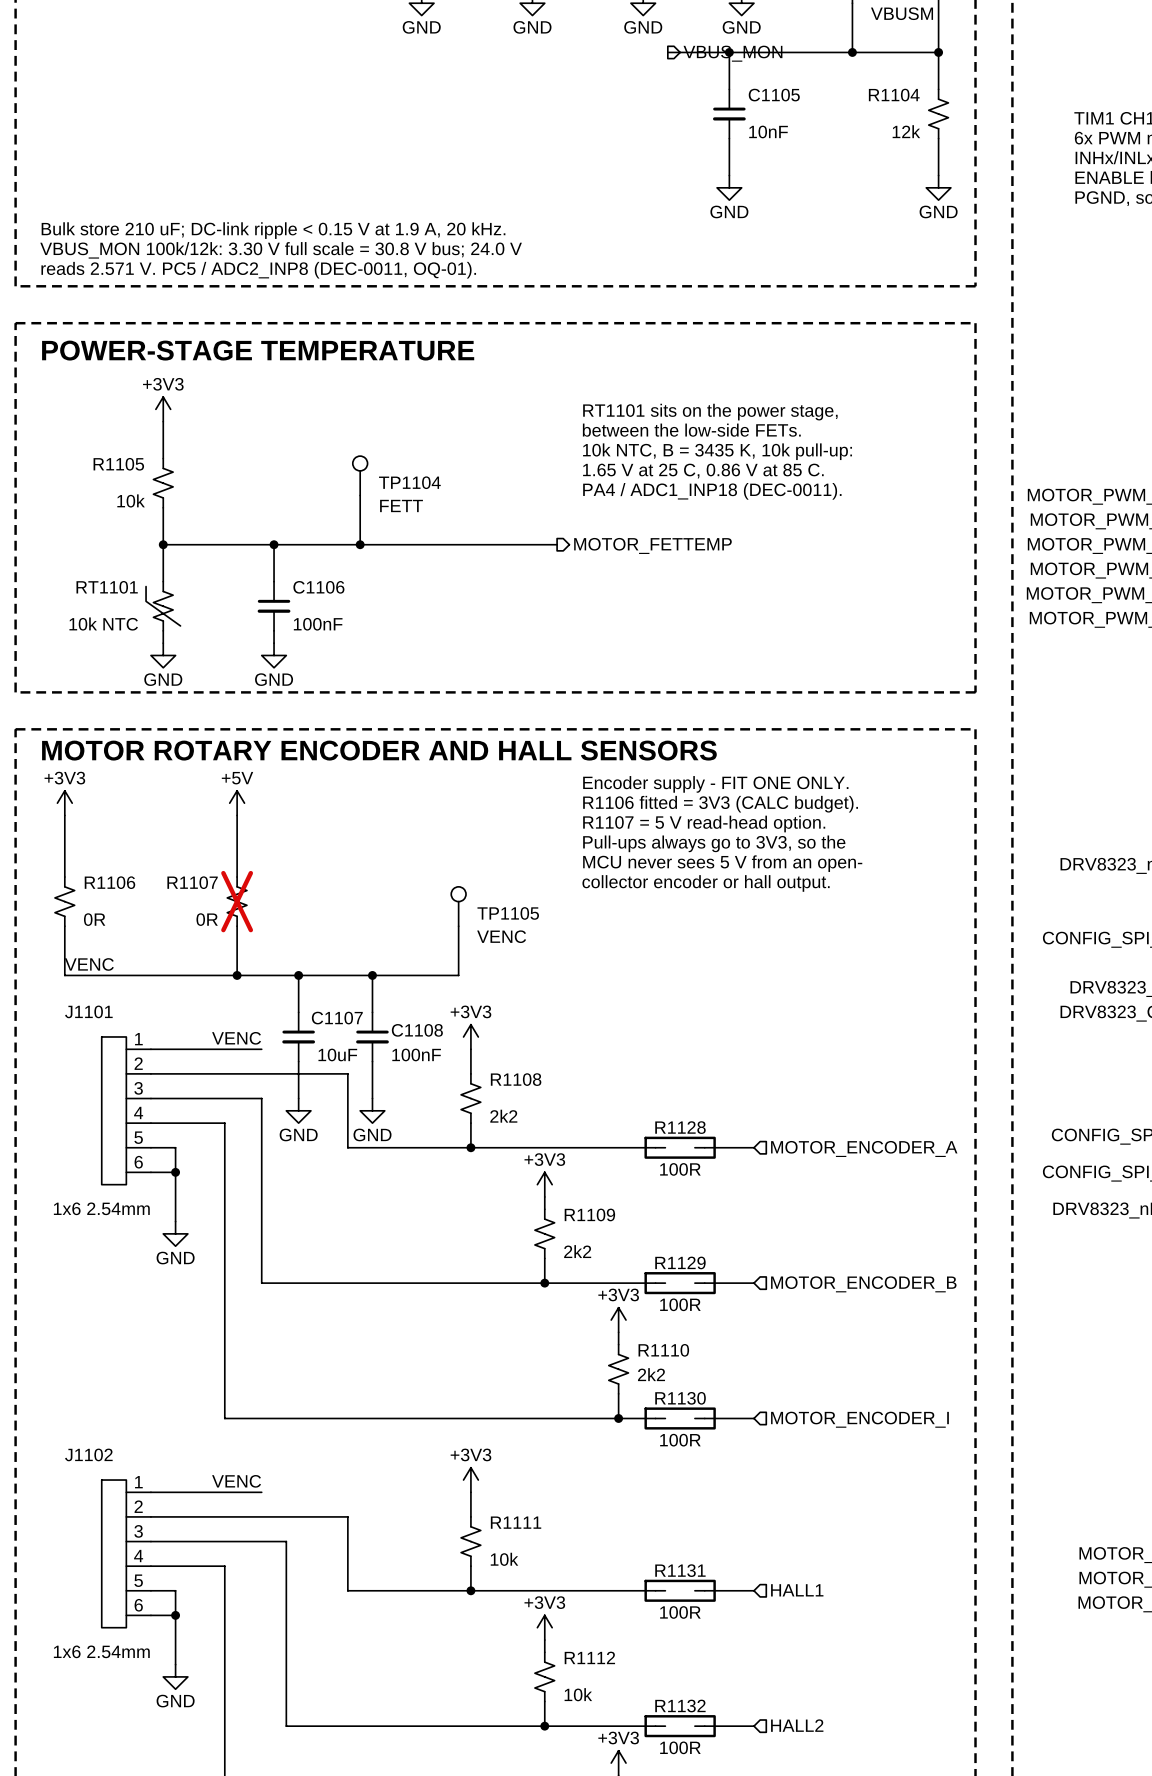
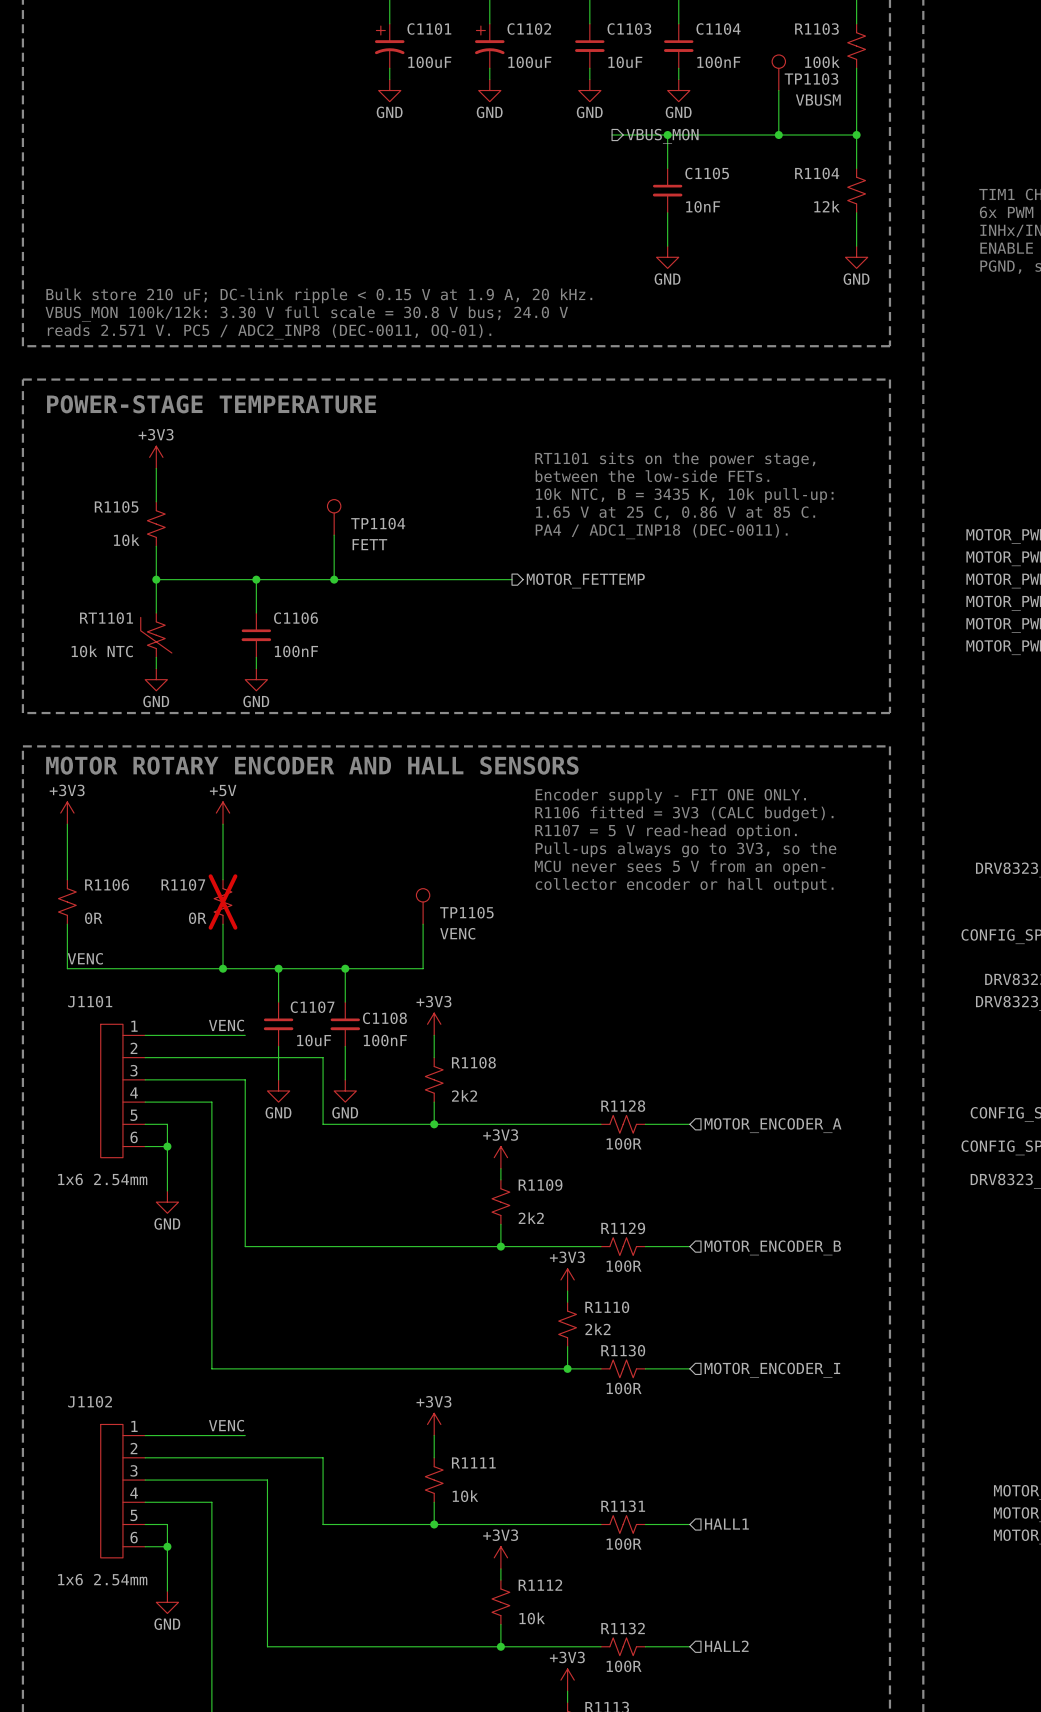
R1128 symbol: [644, 1136, 716, 1159] -> [600, 1115, 646, 1134]
R1129 symbol: [644, 1272, 716, 1295] -> [600, 1237, 646, 1256]
R1130 symbol: [644, 1407, 716, 1430] -> [600, 1359, 646, 1378]
R1131 symbol: [644, 1579, 716, 1602] -> [600, 1515, 646, 1534]
R1132 symbol: [644, 1715, 716, 1738] -> [600, 1637, 646, 1656]

